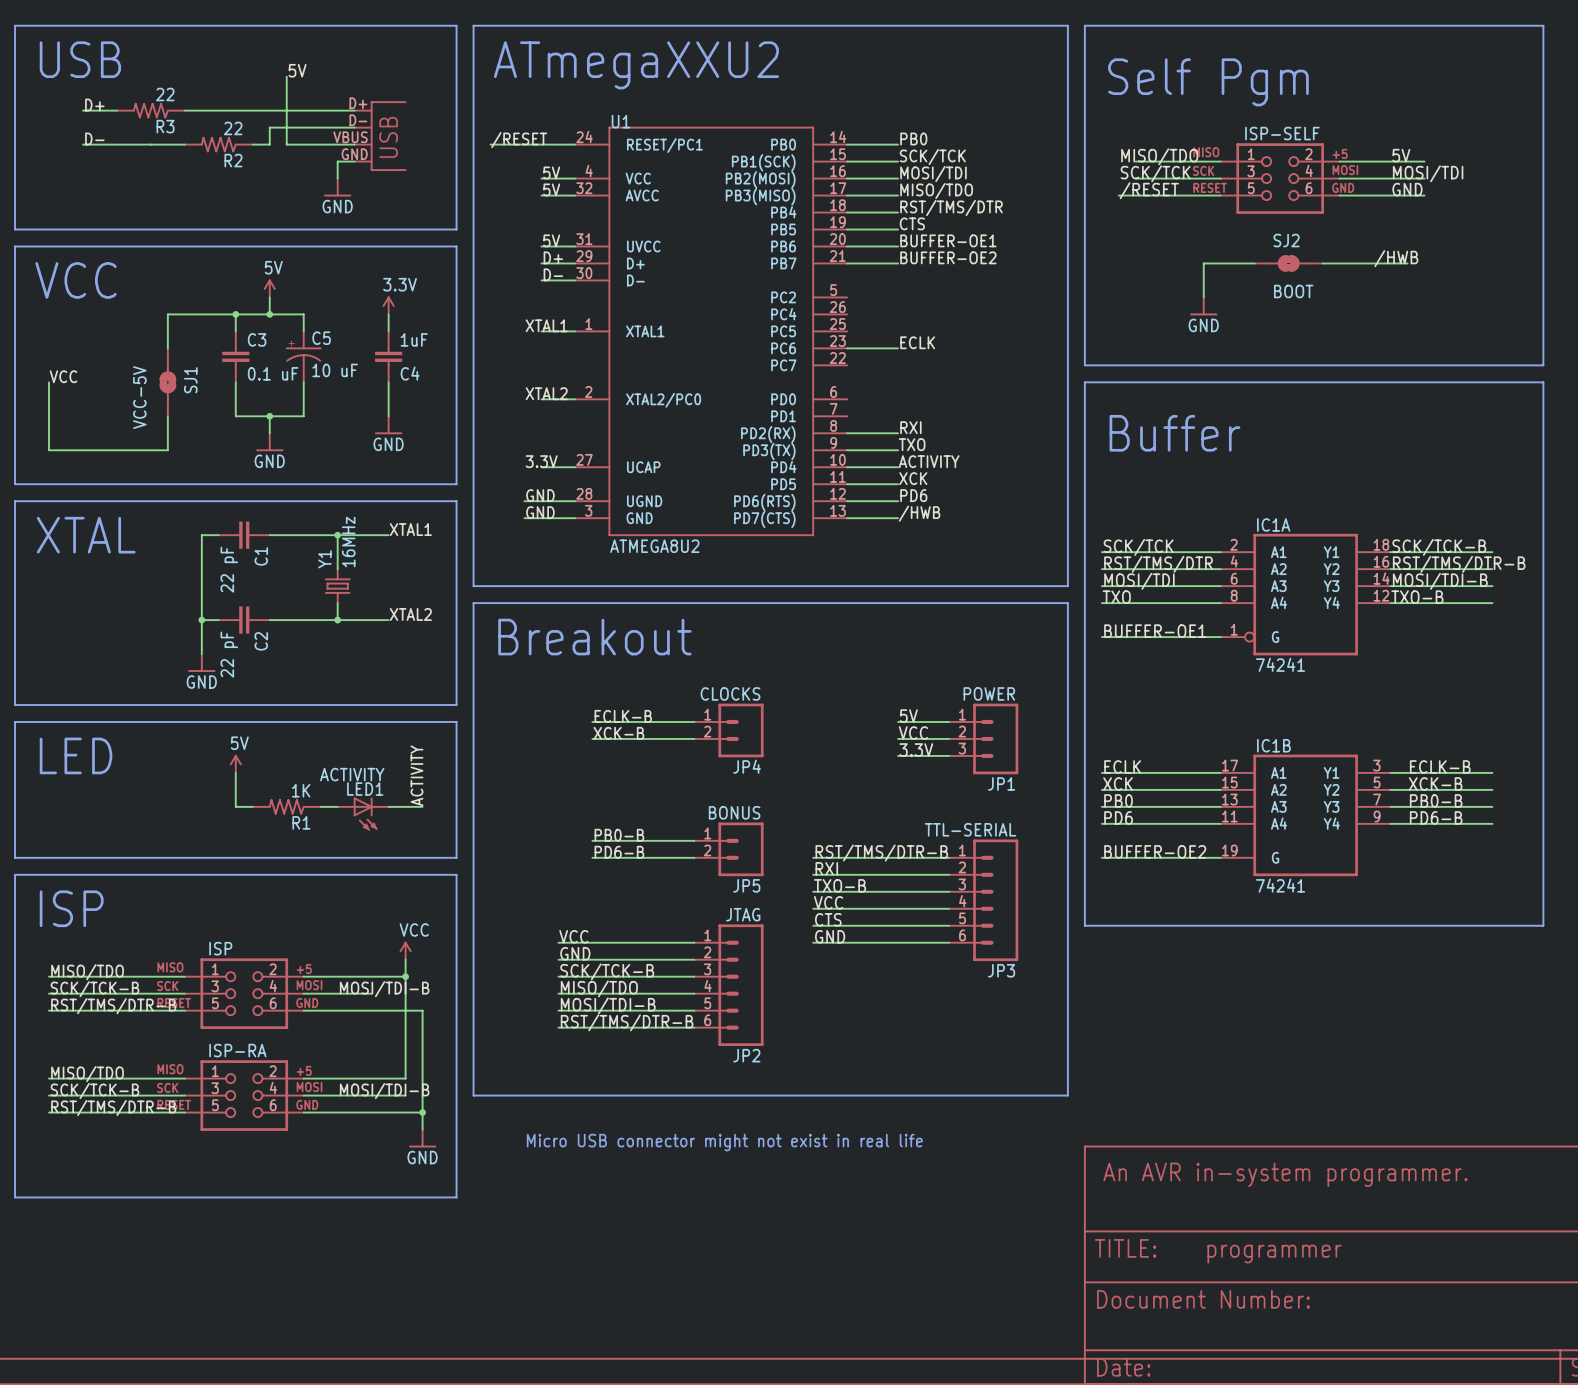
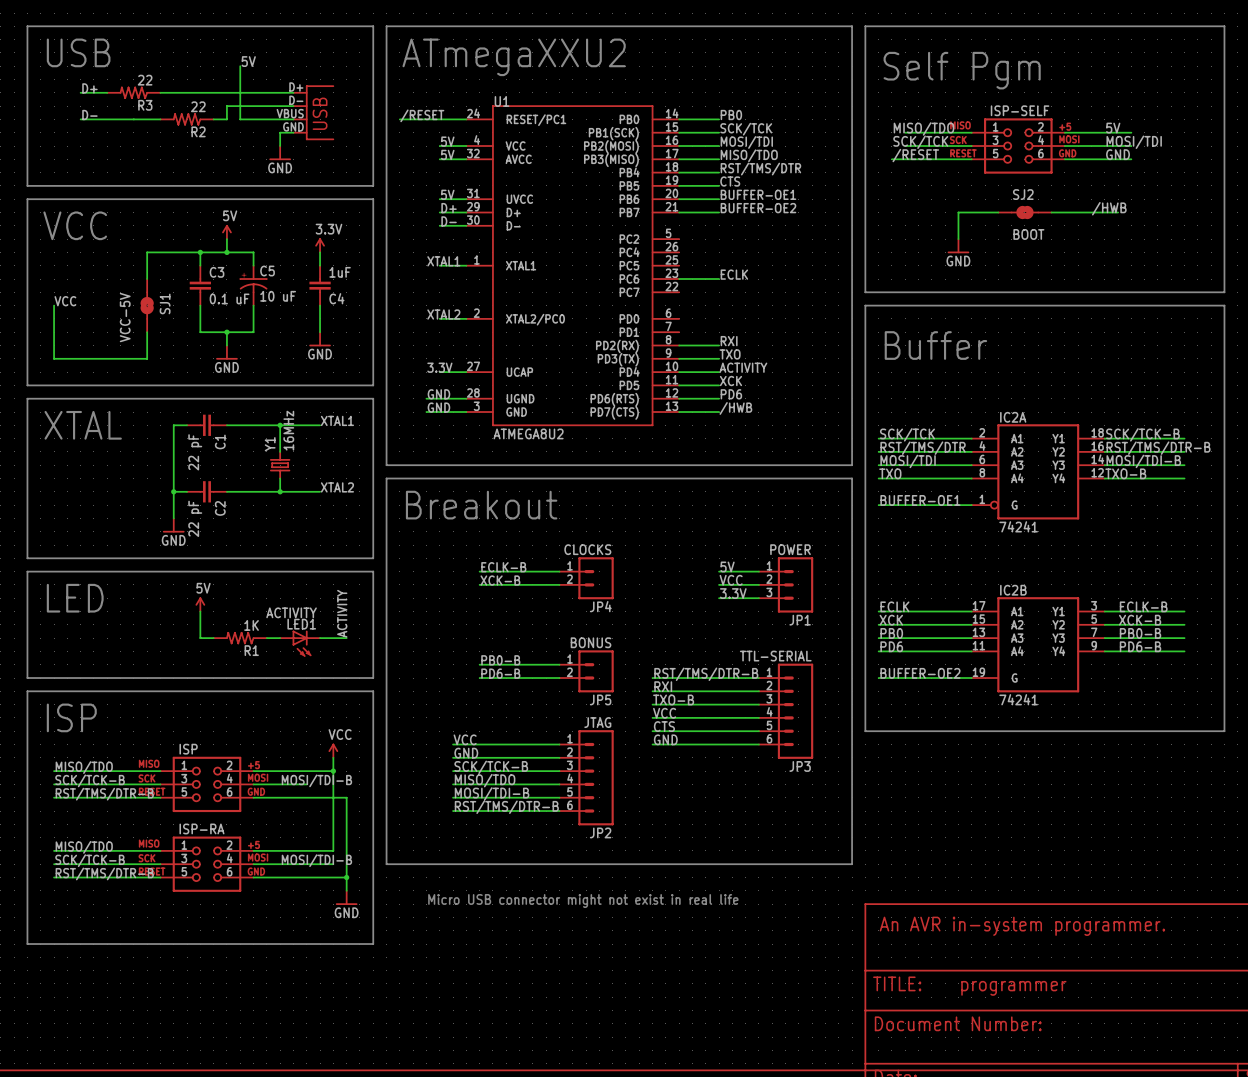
IC1A name: IC1A (1273, 524) -> IC2A (1013, 417)
IC1B name: IC1B (1273, 745) -> IC2B (1013, 590)

